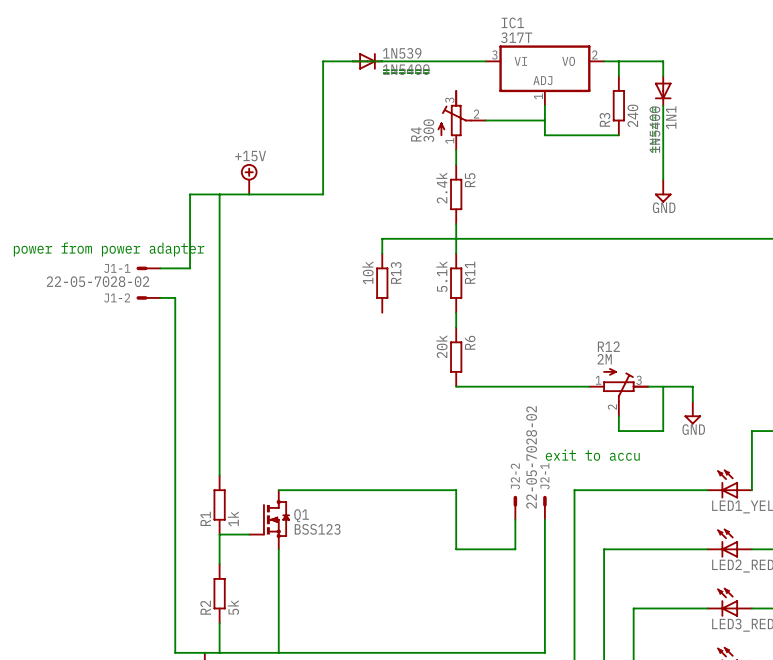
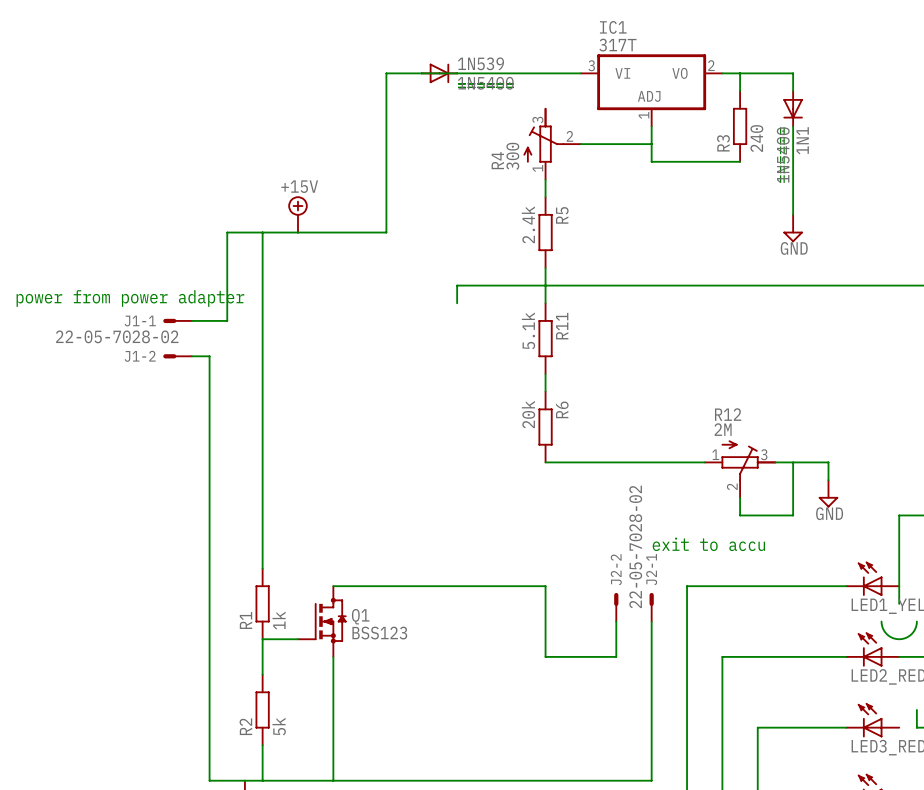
R13: 10k (382, 283) -> none
wire: none -> (899, 586) (899, 603)
wire: none -> (881, 621) (886, 634) (899, 639) (911, 634) (916, 621)
wire: (751, 608) (766, 608) -> (916, 709) (916, 727)

